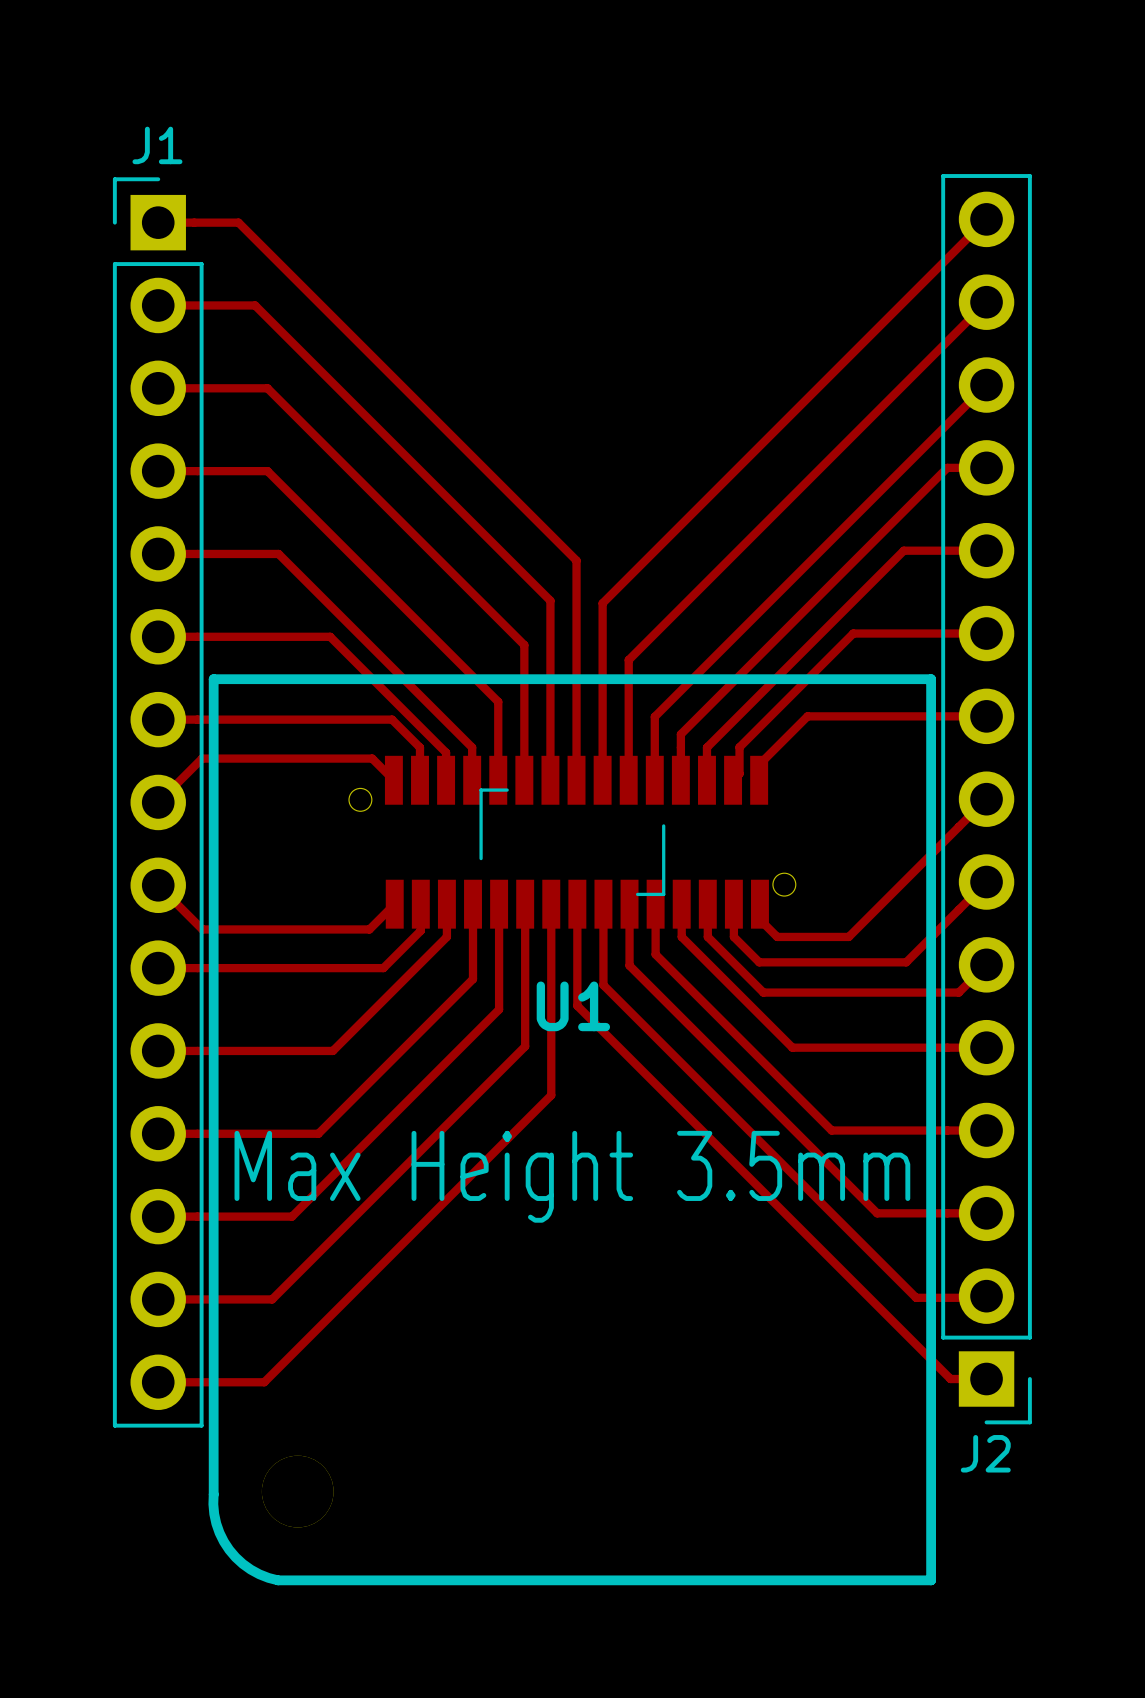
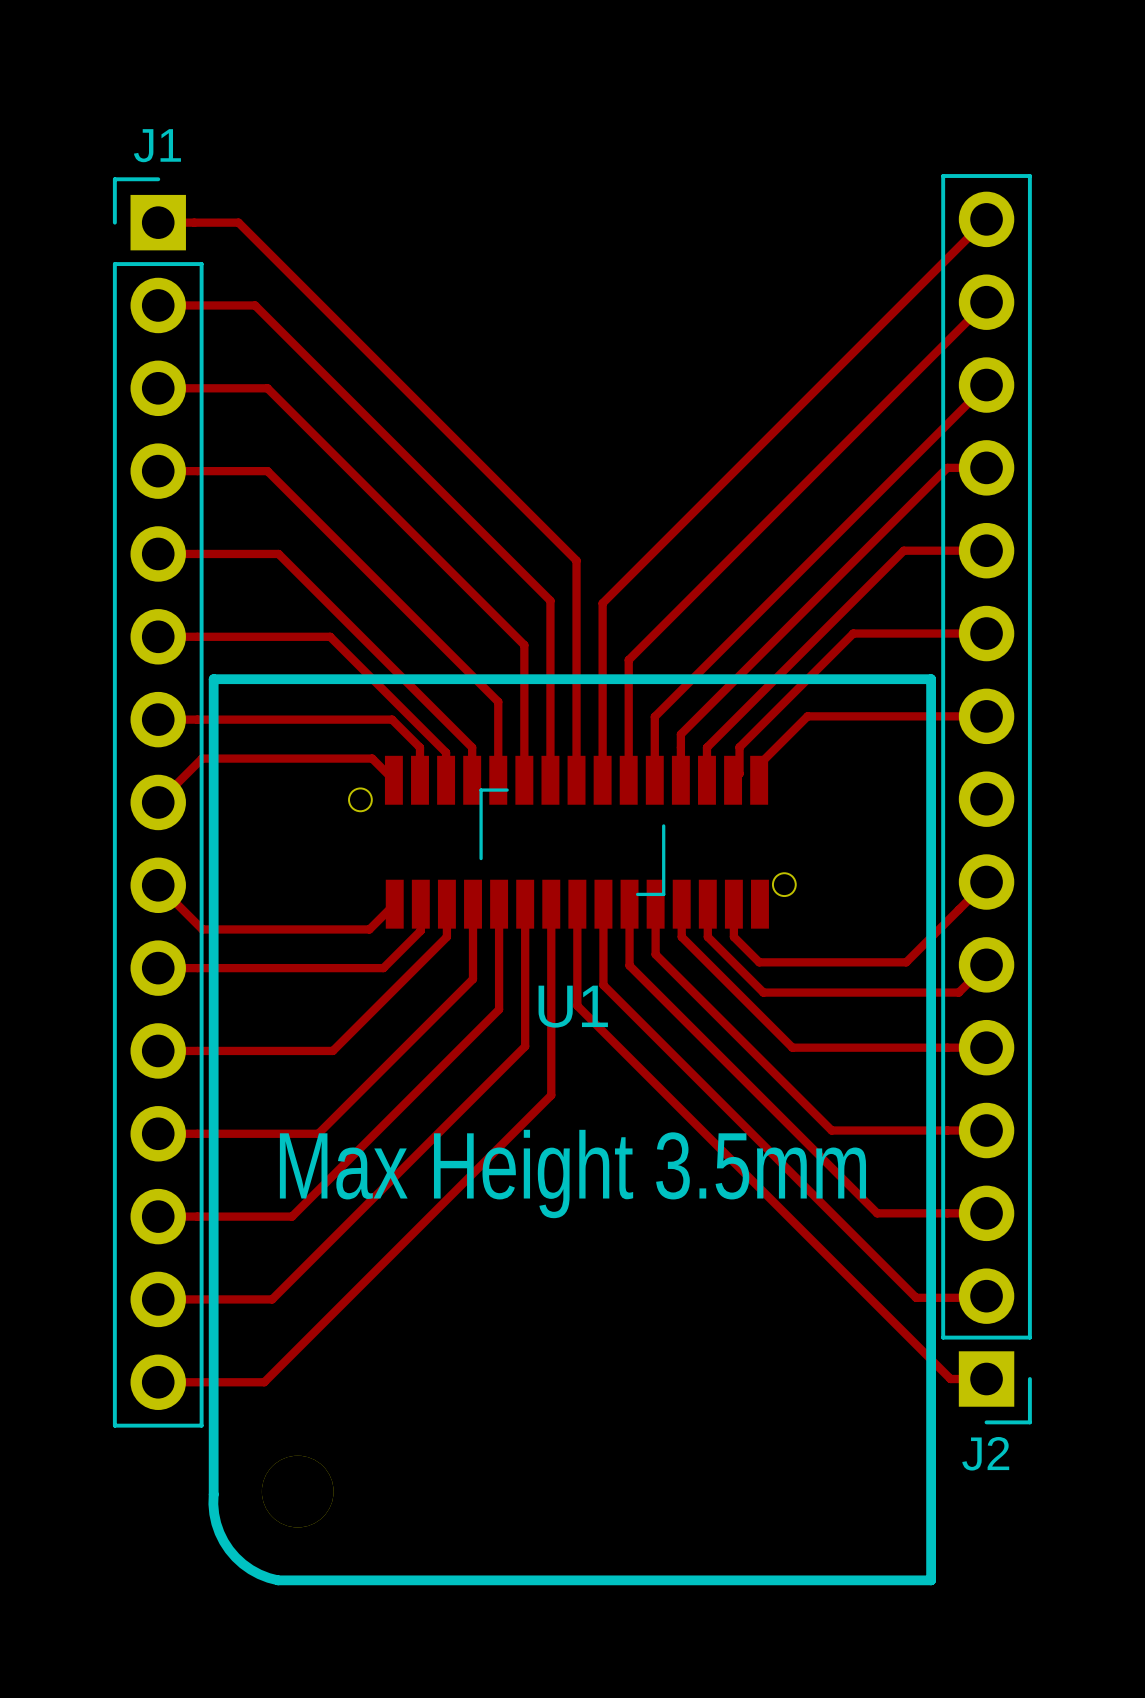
top track: (986, 799) (848, 936) (777, 936) (759, 919) (759, 904) -> none

